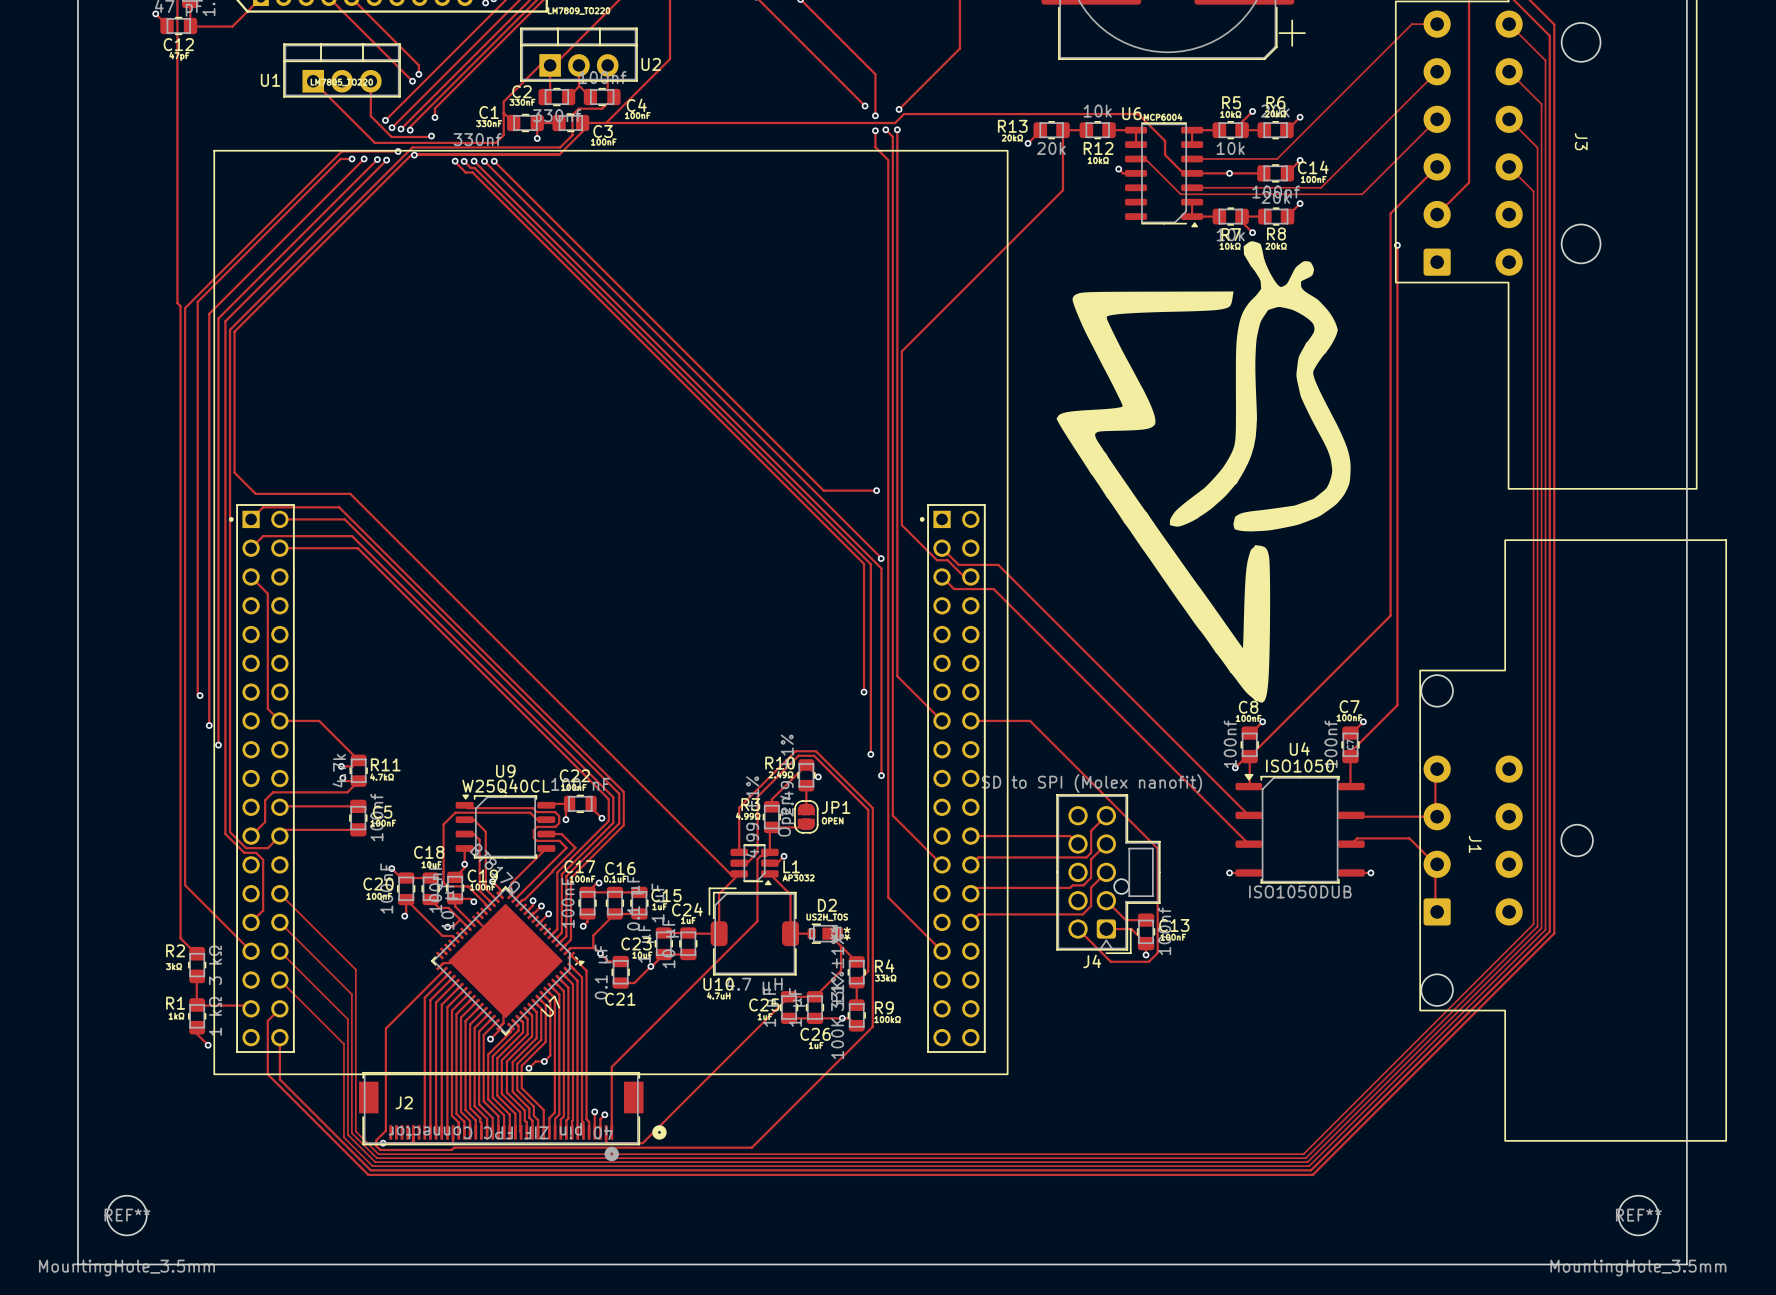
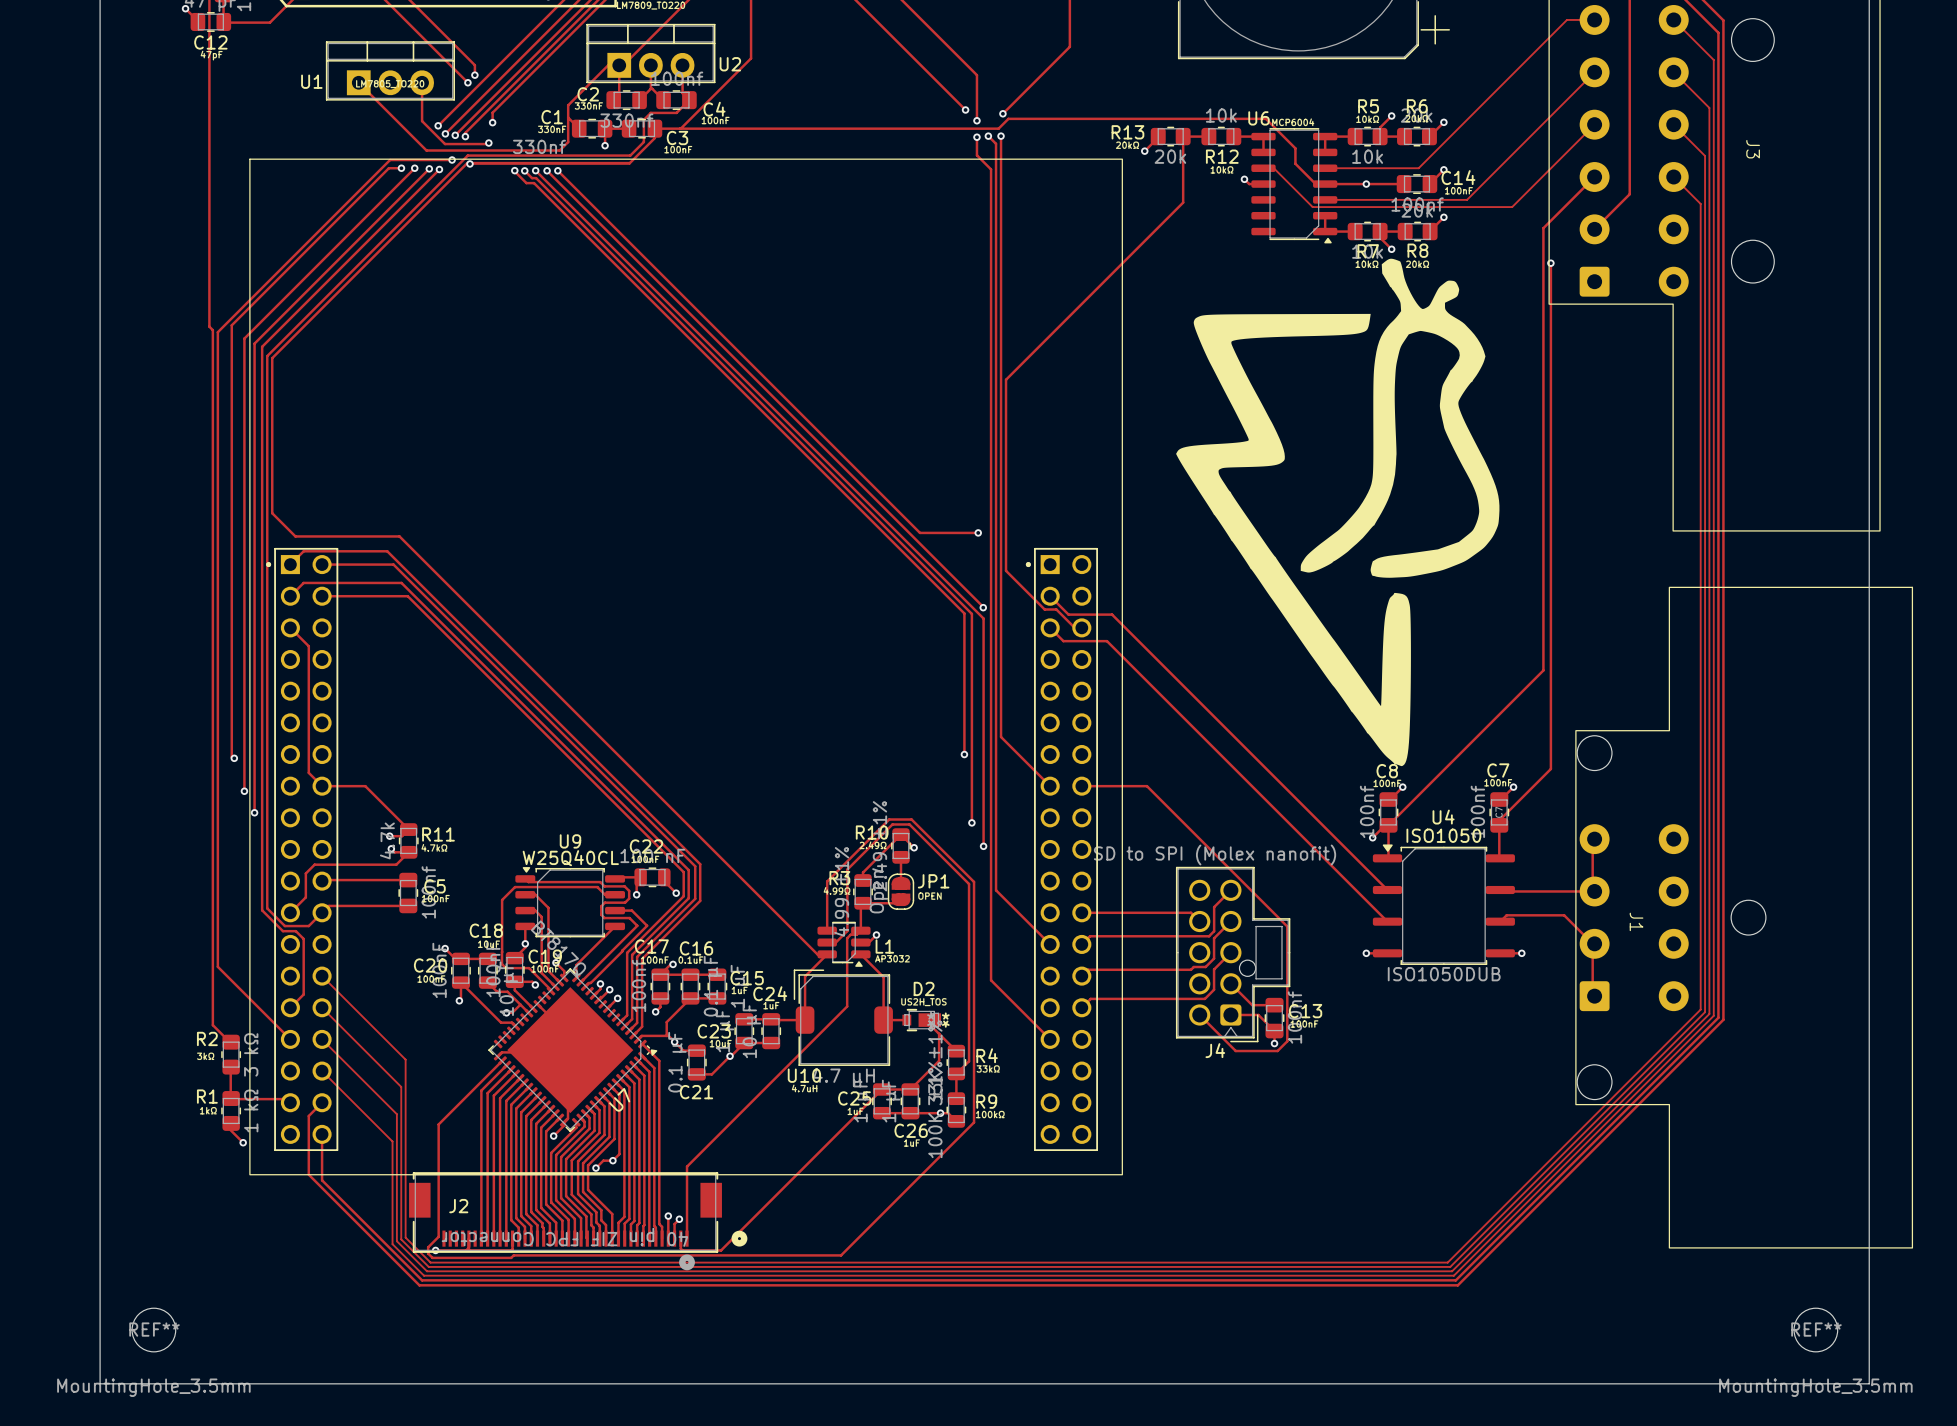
C17 value: 100nF (568, 902) -> 100nf (639, 985)

